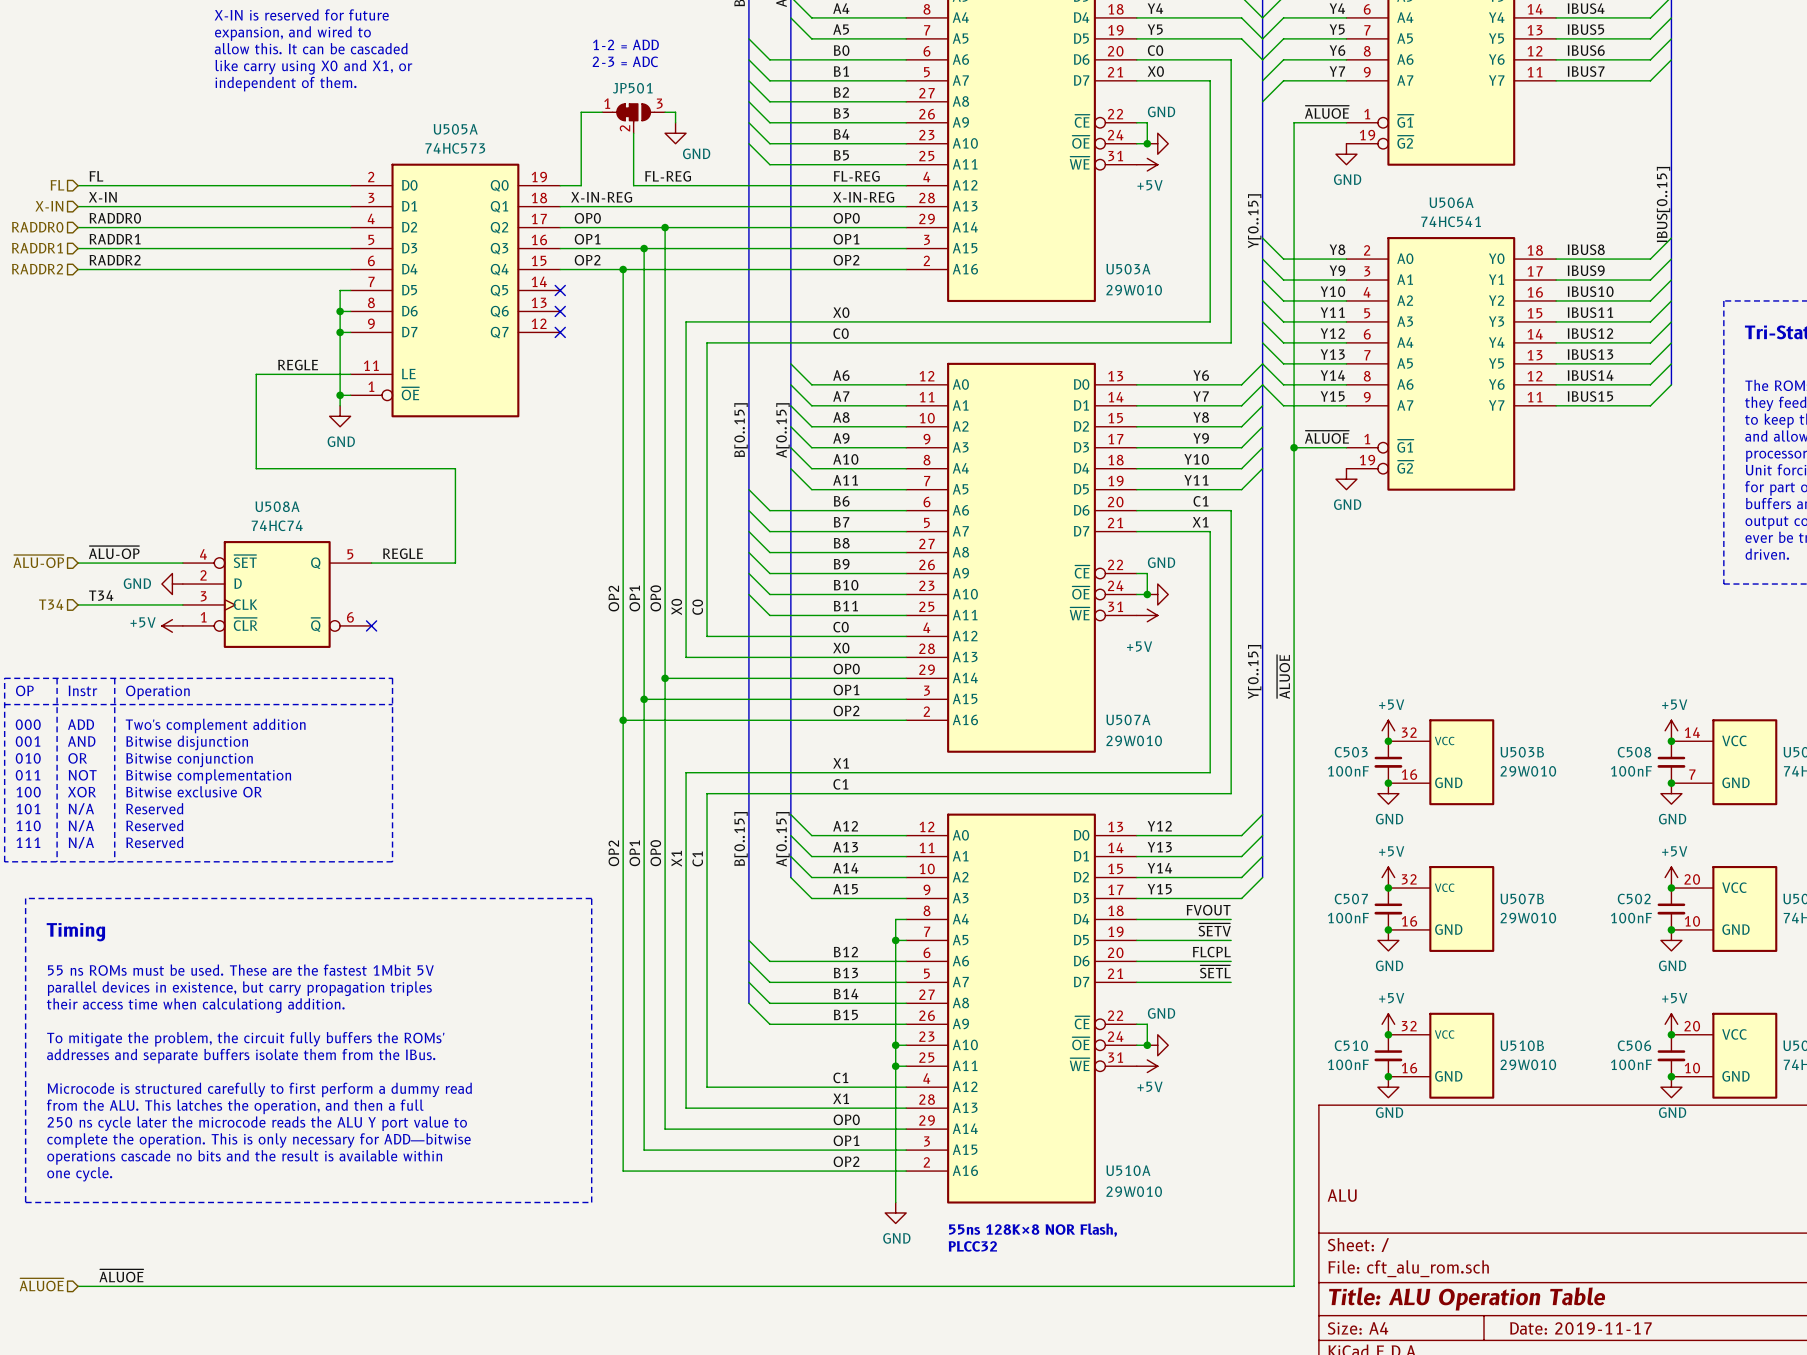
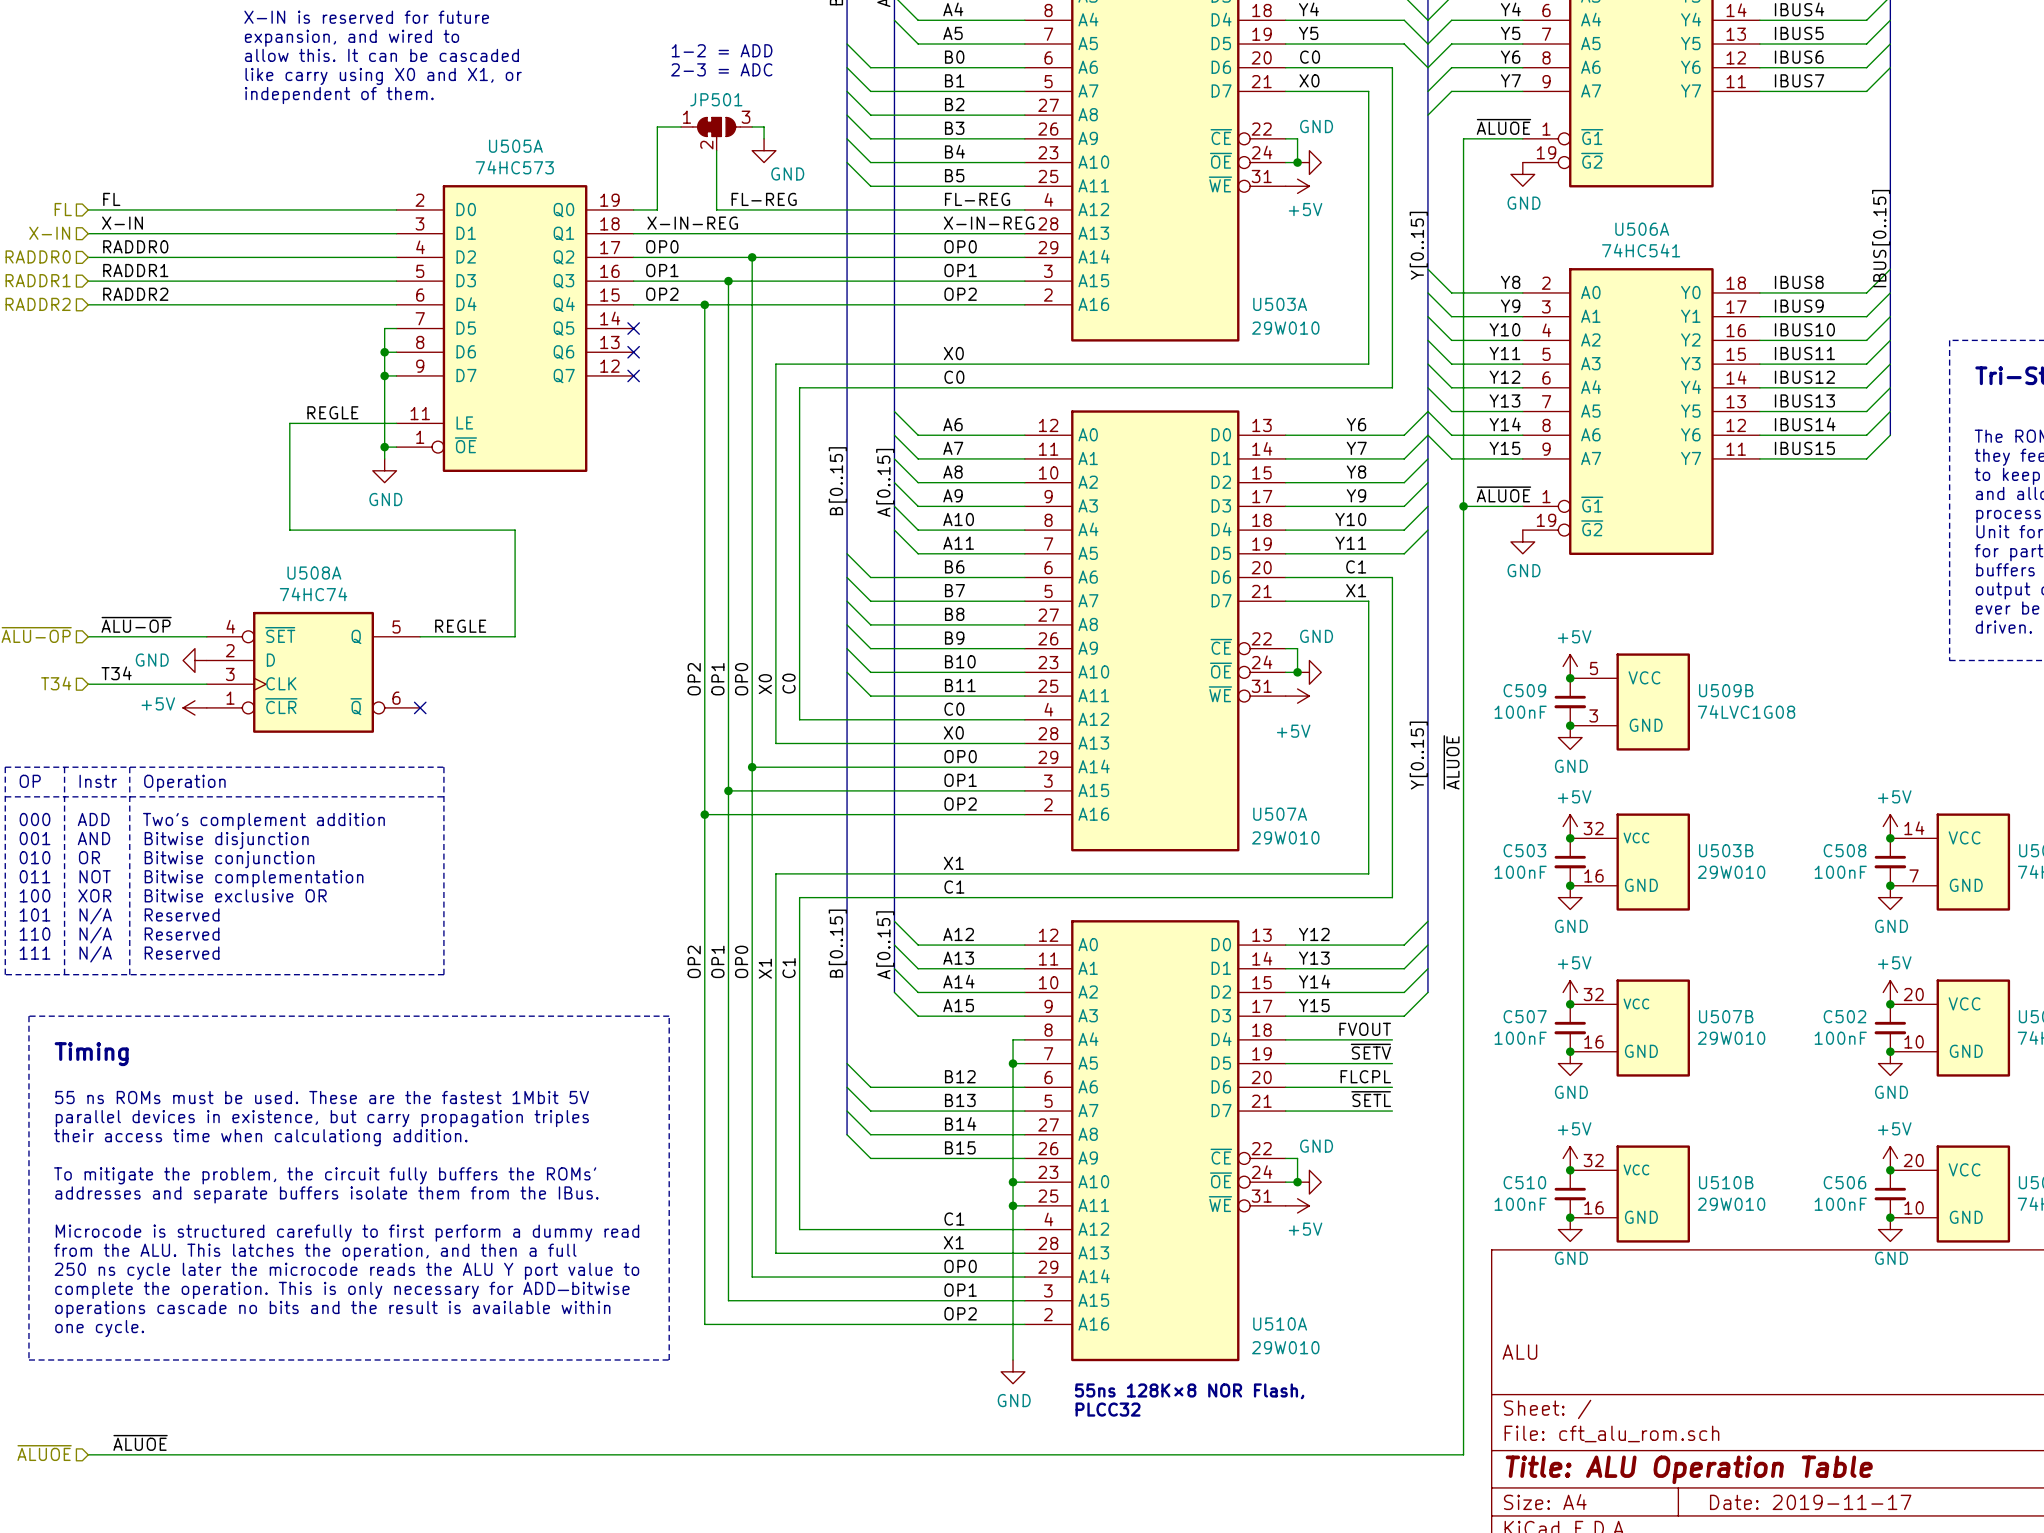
power symbol: none -> +5V (1570, 666)
junction: none -> (1570, 678)
C509: none -> 100nF (1570, 702)
U509B: none -> 74LVC1G08 (1630, 702)
junction: none -> (1570, 725)
power symbol: none -> GND (1570, 737)

